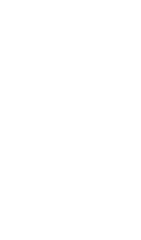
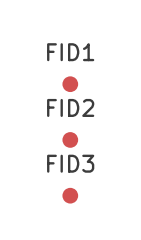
FID1: none -> (70, 84)
FID2: none -> (70, 139)
FID3: none -> (70, 195)

